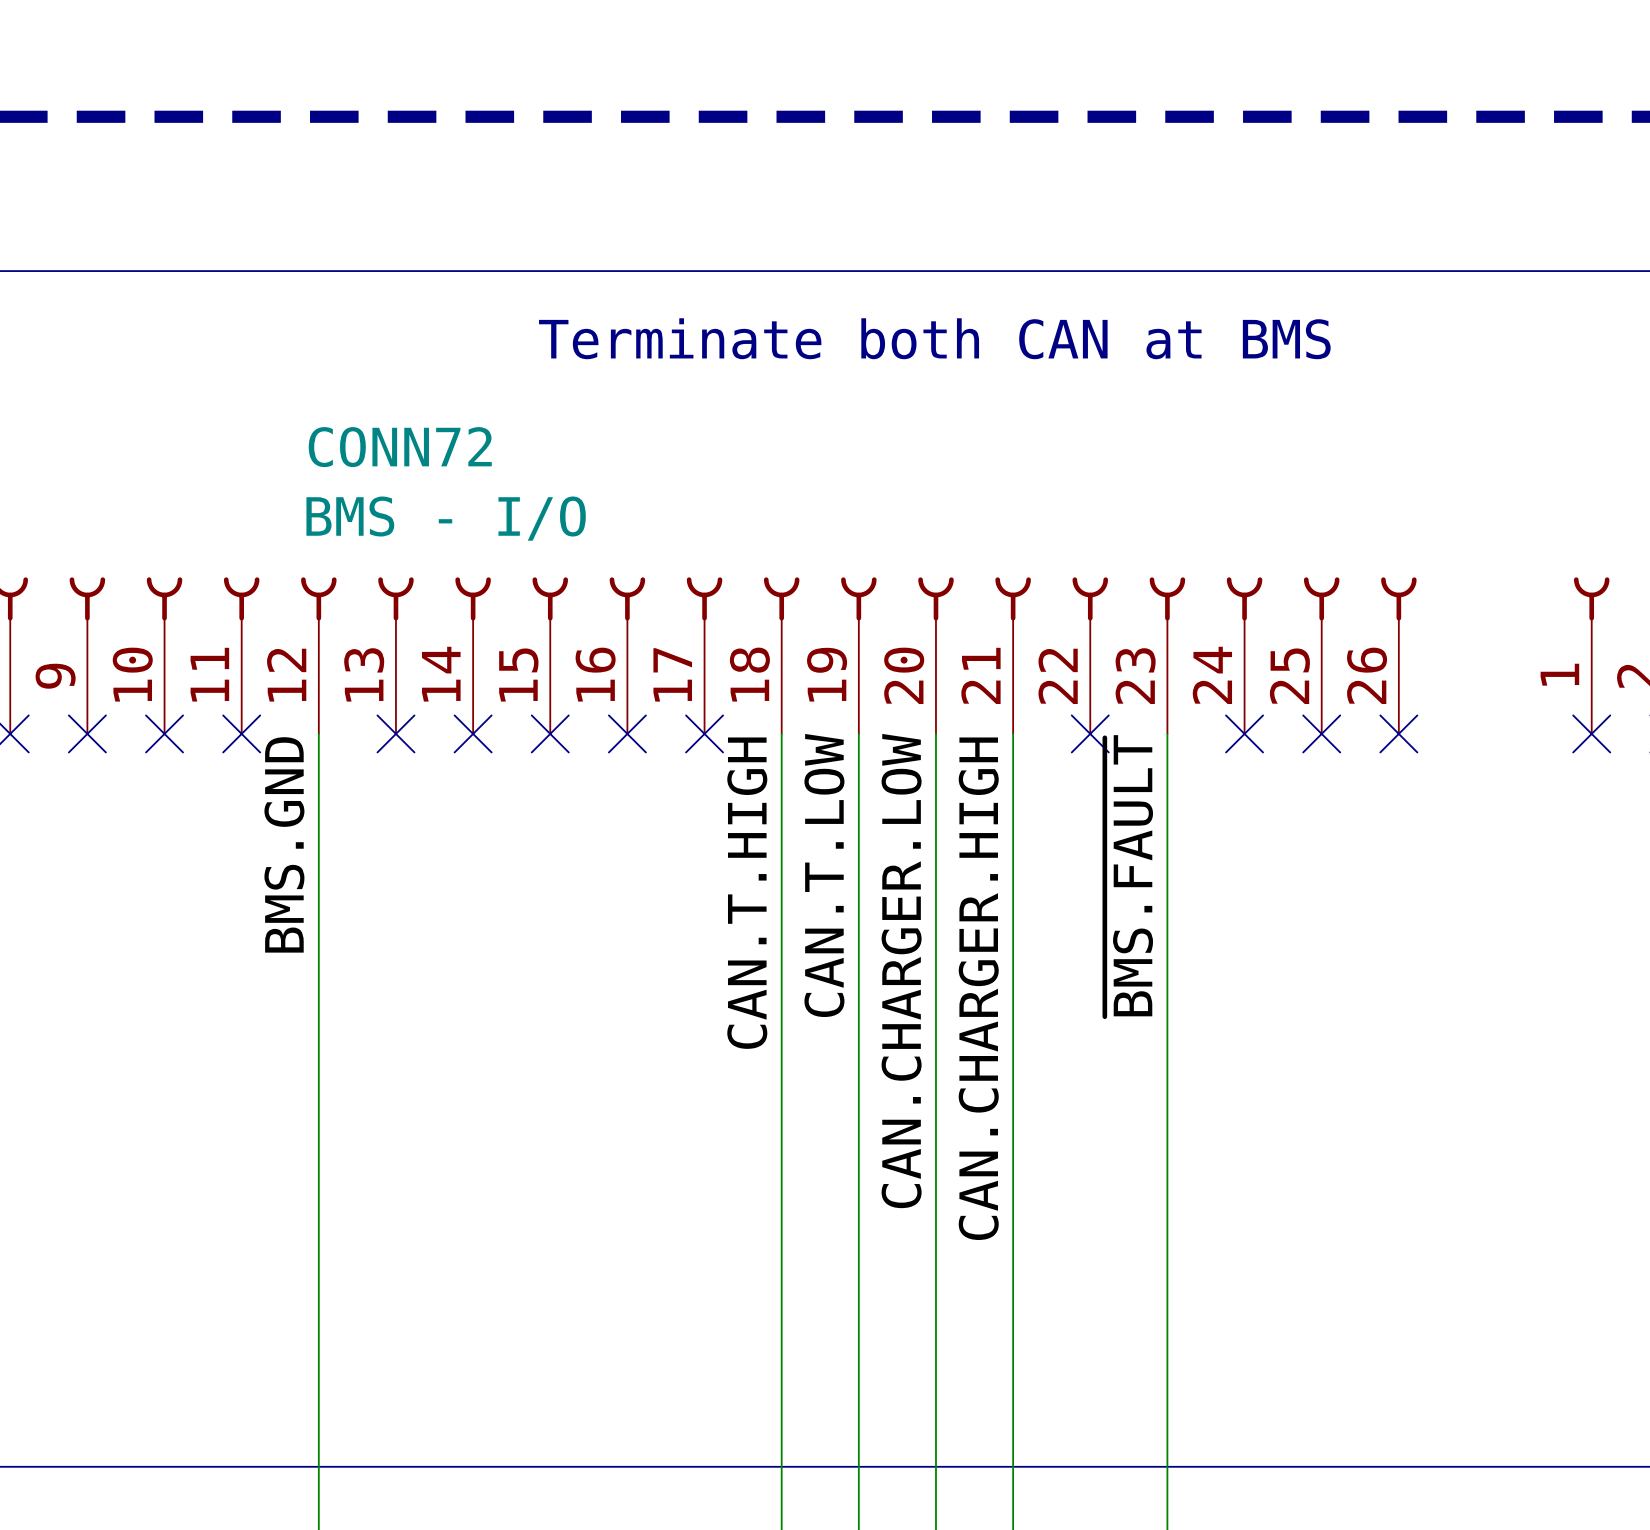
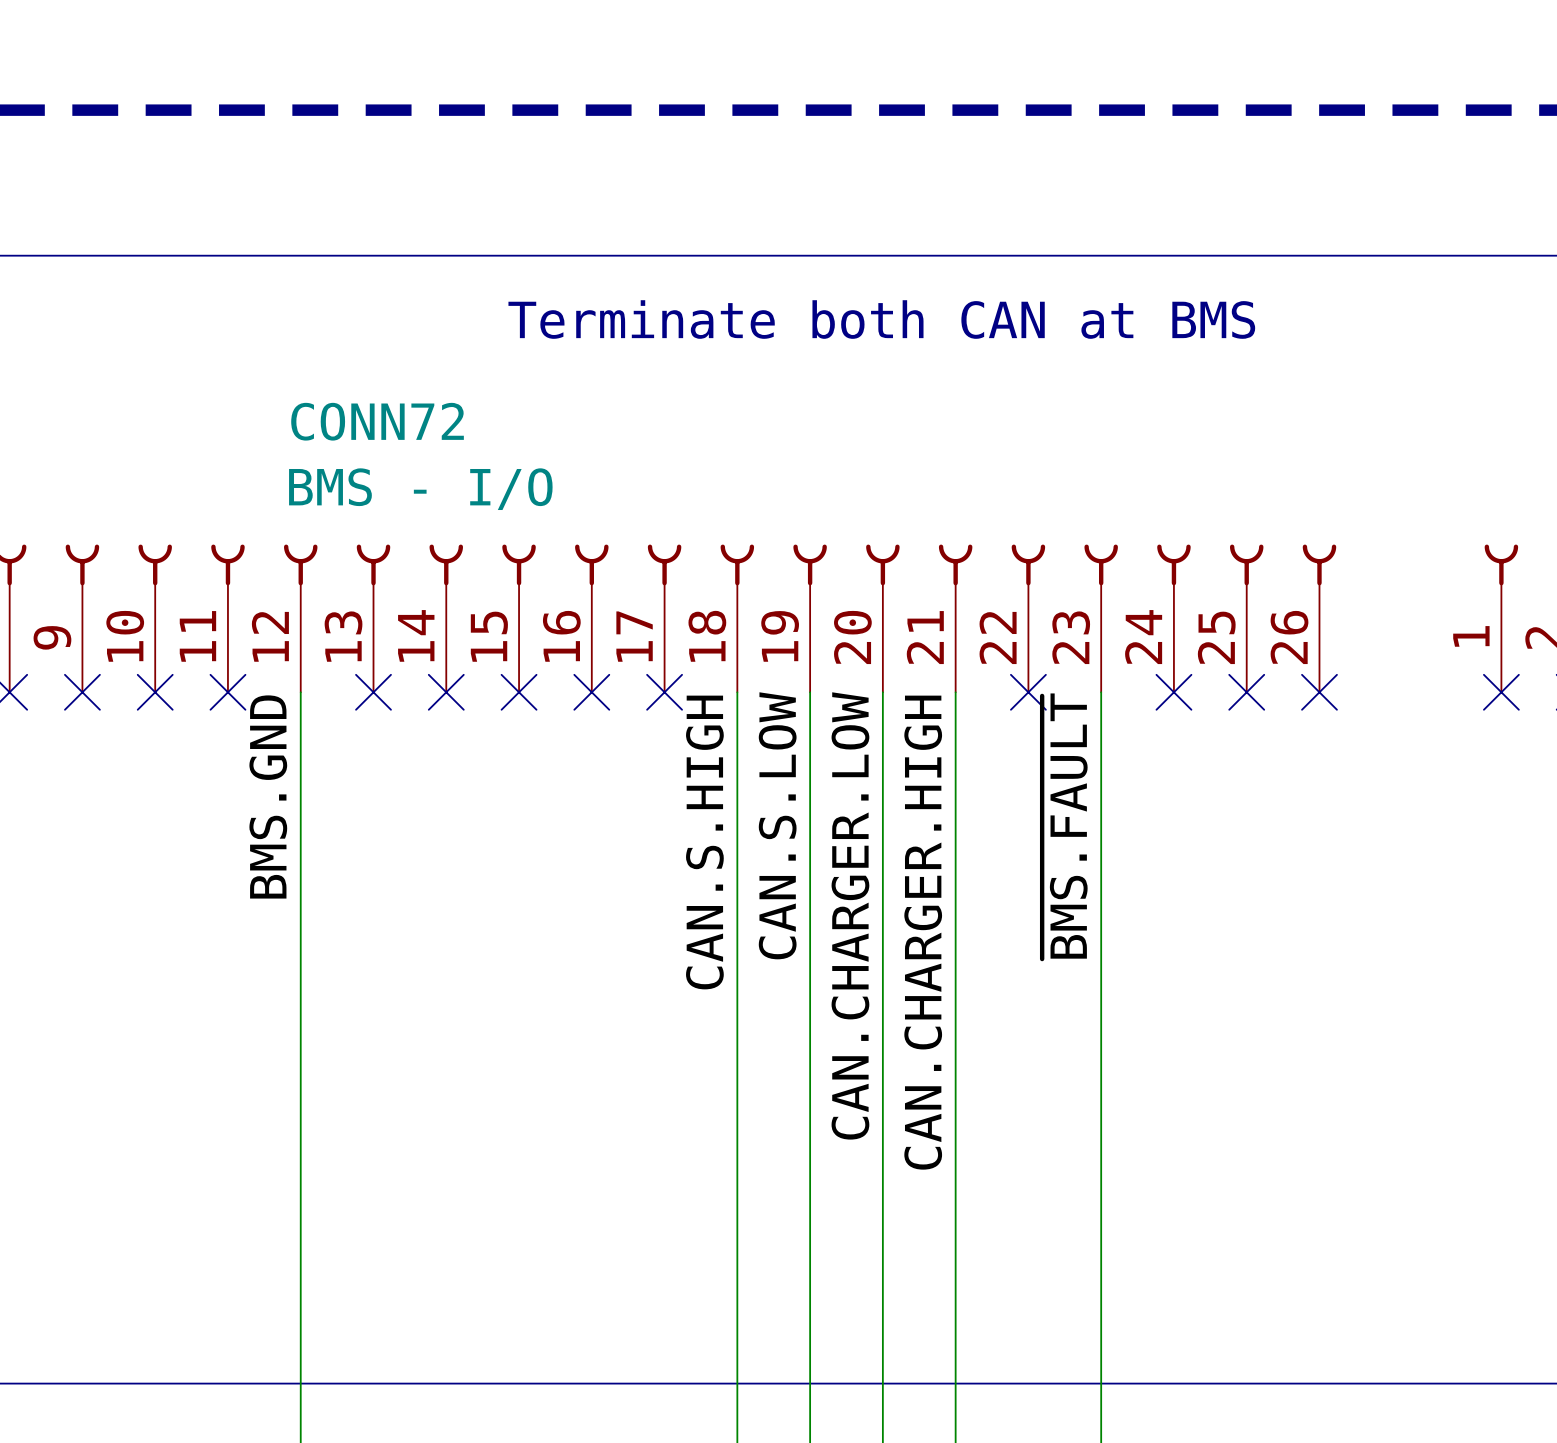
label: CAN.T.LOW (824, 875) -> CAN.S.LOW (777, 825)
label: CAN.T.HIGH (747, 893) -> CAN.S.HIGH (704, 842)

